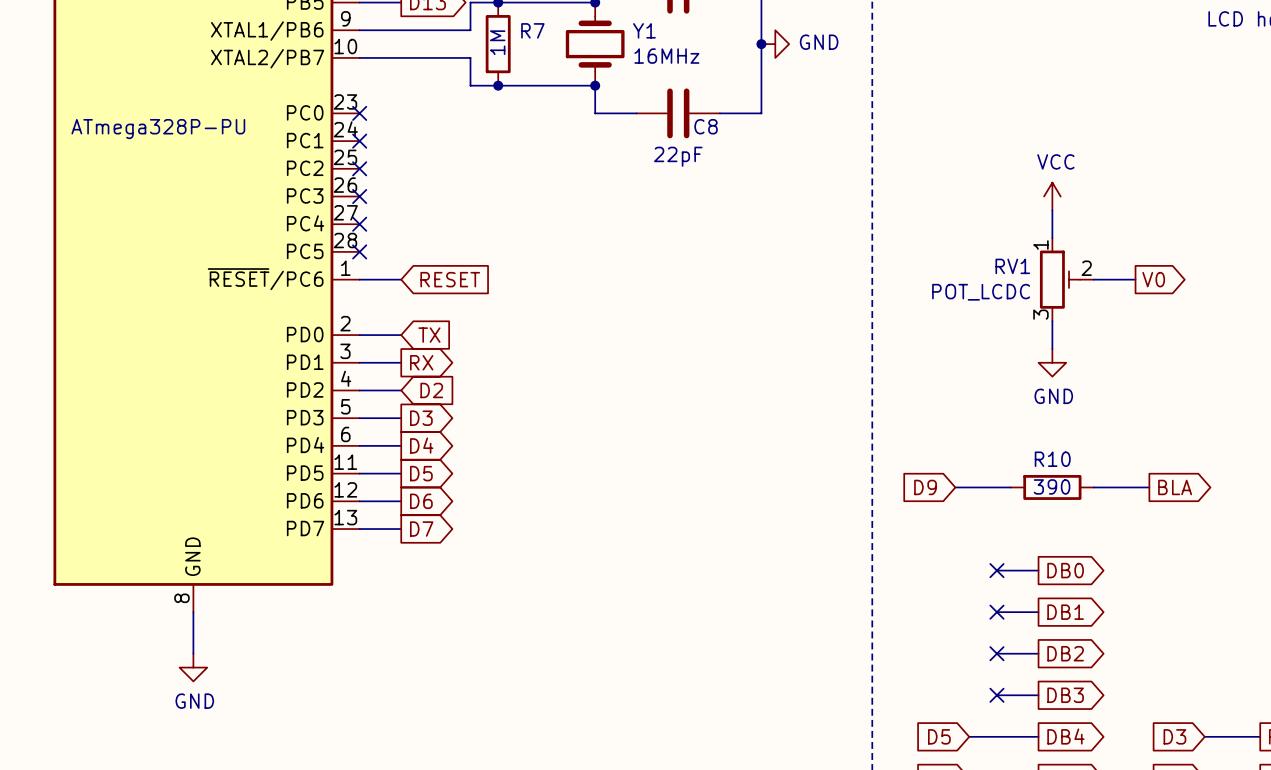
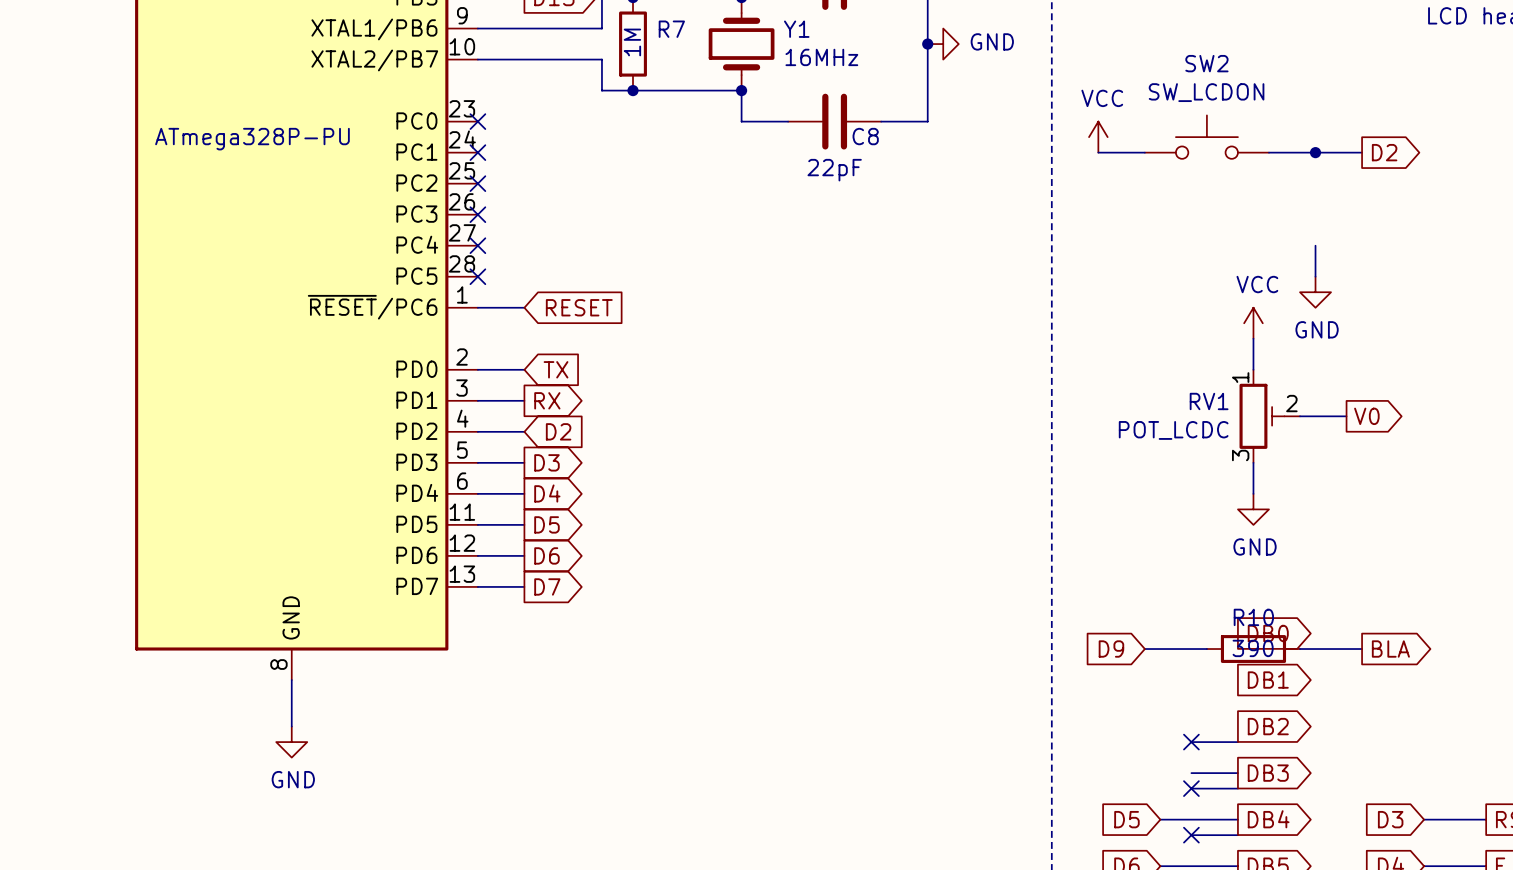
power symbol: none -> VCC (1098, 137)
SW2: none -> SW_LCDON (1206, 137)
wire: none -> (1098, 152) (1144, 152)
wire: none -> (1268, 152) (1362, 152)
junction: none -> (1315, 152)
global label: none -> D2 (1384, 152)
power symbol: VCC (1052, 196) -> none
wire: (1052, 210) (1052, 238) -> (1253, 462) (1253, 493)
wire: none -> (1315, 245) (1315, 276)
power symbol: none -> GND (1315, 292)
RV1 position: (1066, 279) -> (1269, 416)
wire: (1093, 279) (1135, 279) -> (1300, 416) (1346, 416)
global label position: V0 (1153, 279) -> V0 (1366, 416)
power symbol: none -> VCC (1253, 323)
power symbol: GND (1052, 362) -> none
power symbol: none -> GND (1253, 509)
global label position: D9 (925, 487) -> D9 (1111, 649)
wire: (955, 487) (1010, 487) -> (1144, 649) (1206, 649)
R10 position: (1052, 487) -> (1253, 649)
wire: (1093, 487) (1149, 487) -> (1300, 649) (1362, 649)
global label position: BLA (1175, 487) -> BLA (1390, 649)
wire: (996, 570) (1038, 570) -> (1191, 742) (1237, 742)
no-connect mark: (996, 570) -> none
wire: (996, 612) (1038, 612) -> (1191, 788) (1237, 788)
no-connect mark: (996, 612) -> none
wire: (996, 653) (1038, 653) -> (1191, 835) (1237, 835)
no-connect mark: (996, 653) -> none
no-connect mark: none -> (1191, 742)
no-connect mark: (996, 695) -> none
no-connect mark: none -> (1191, 788)
no-connect mark: none -> (1191, 835)

